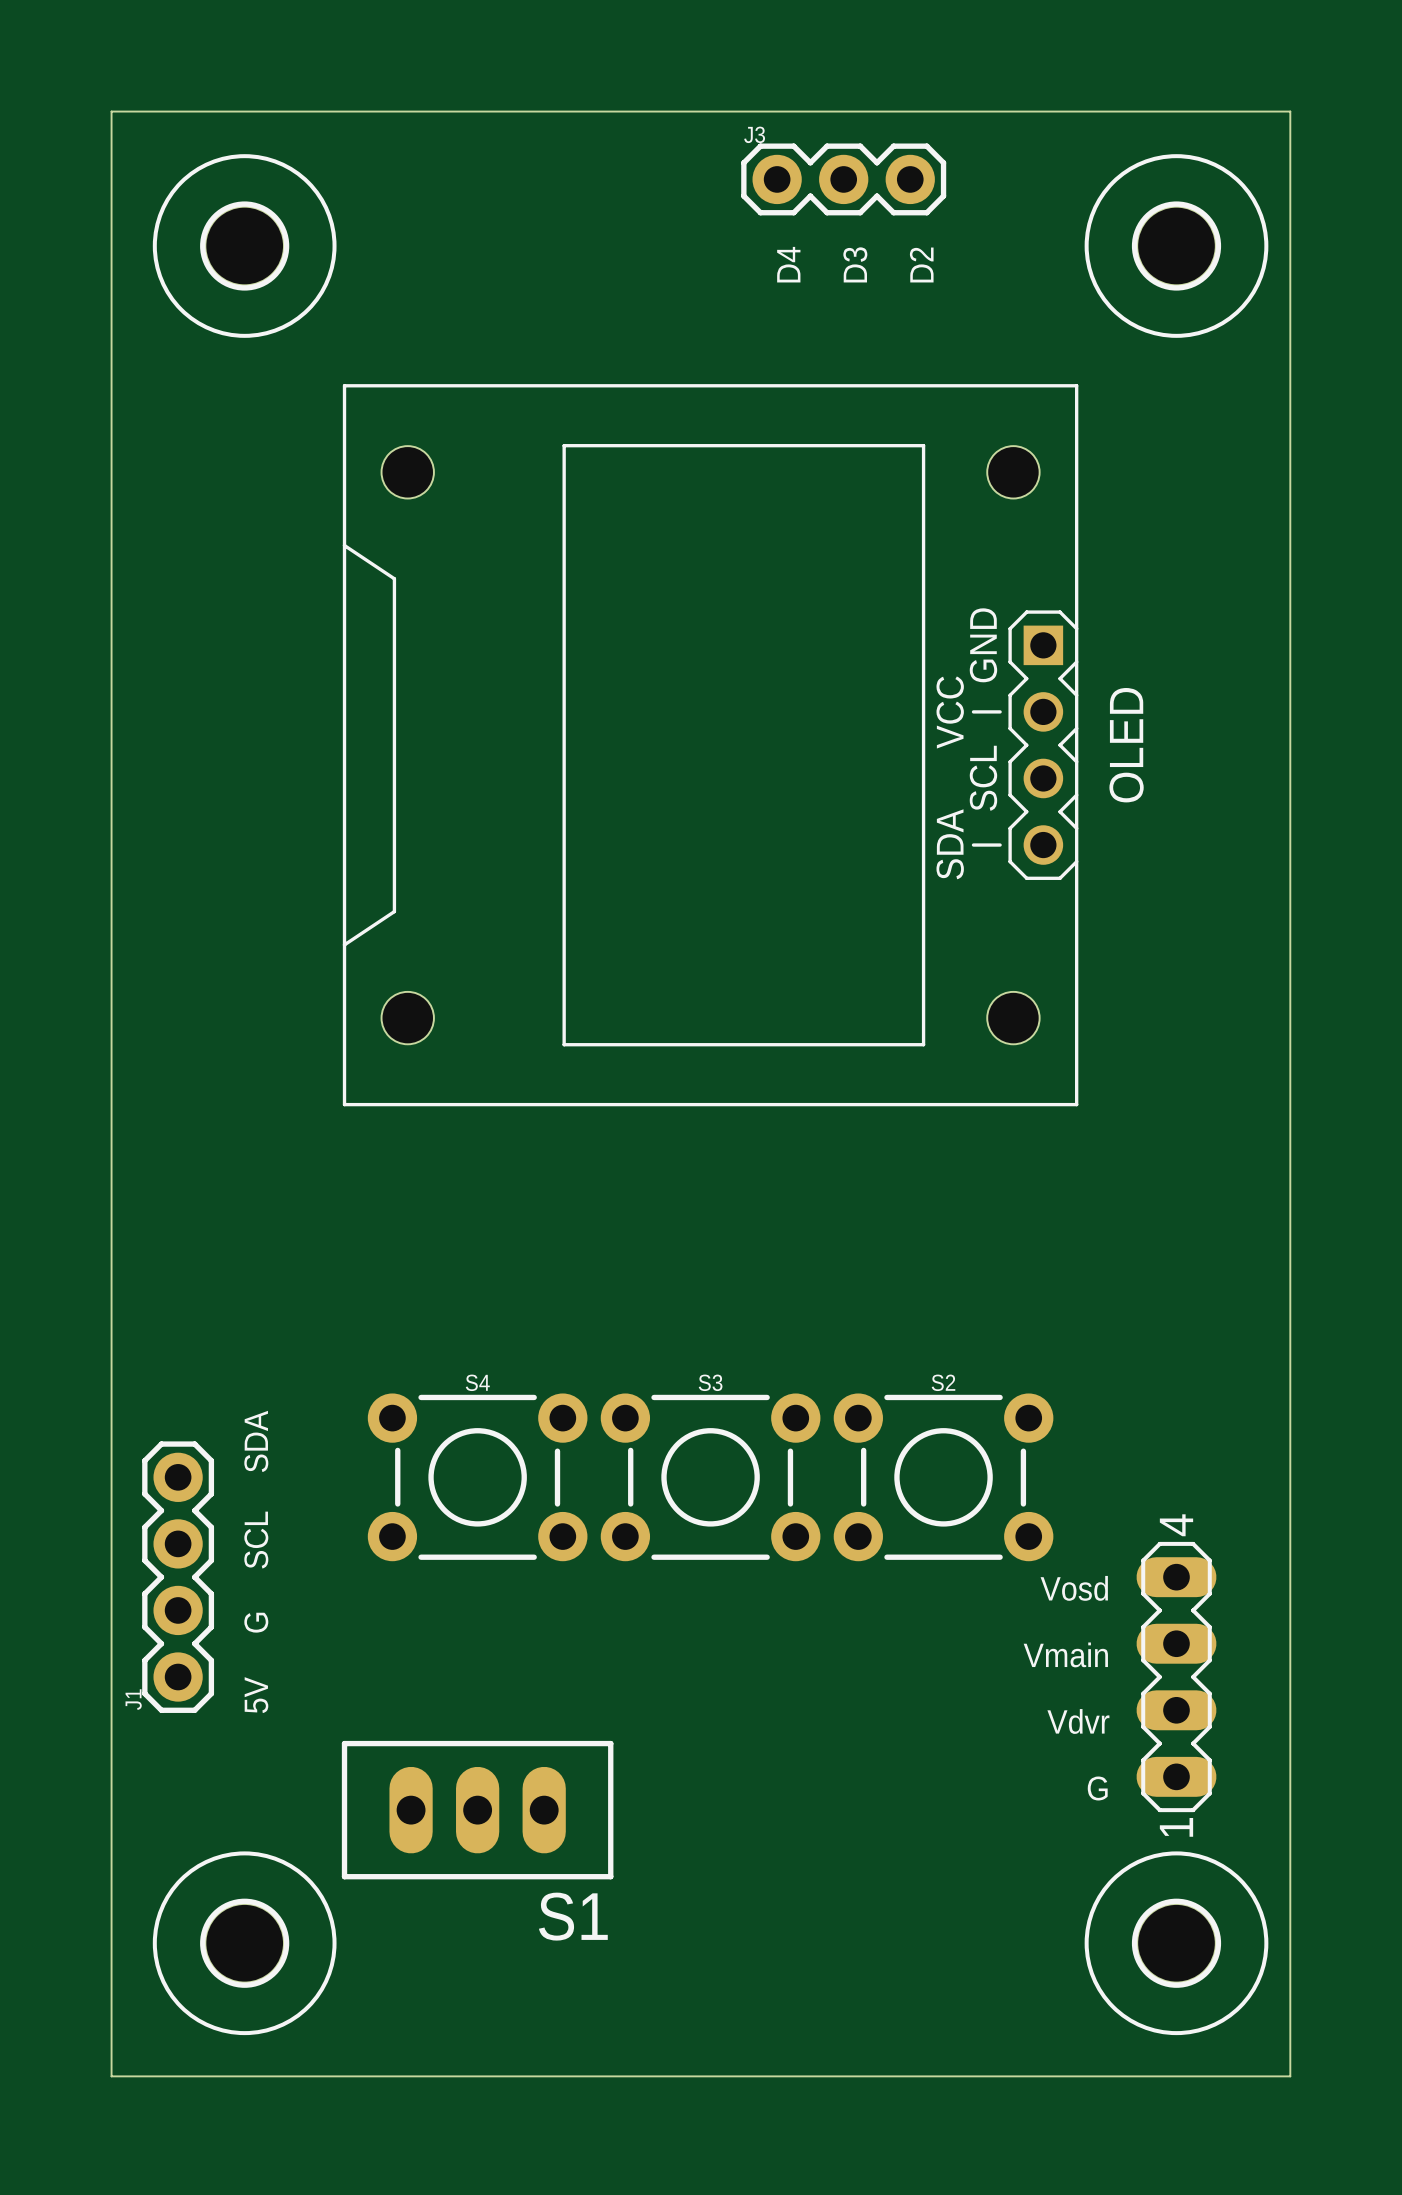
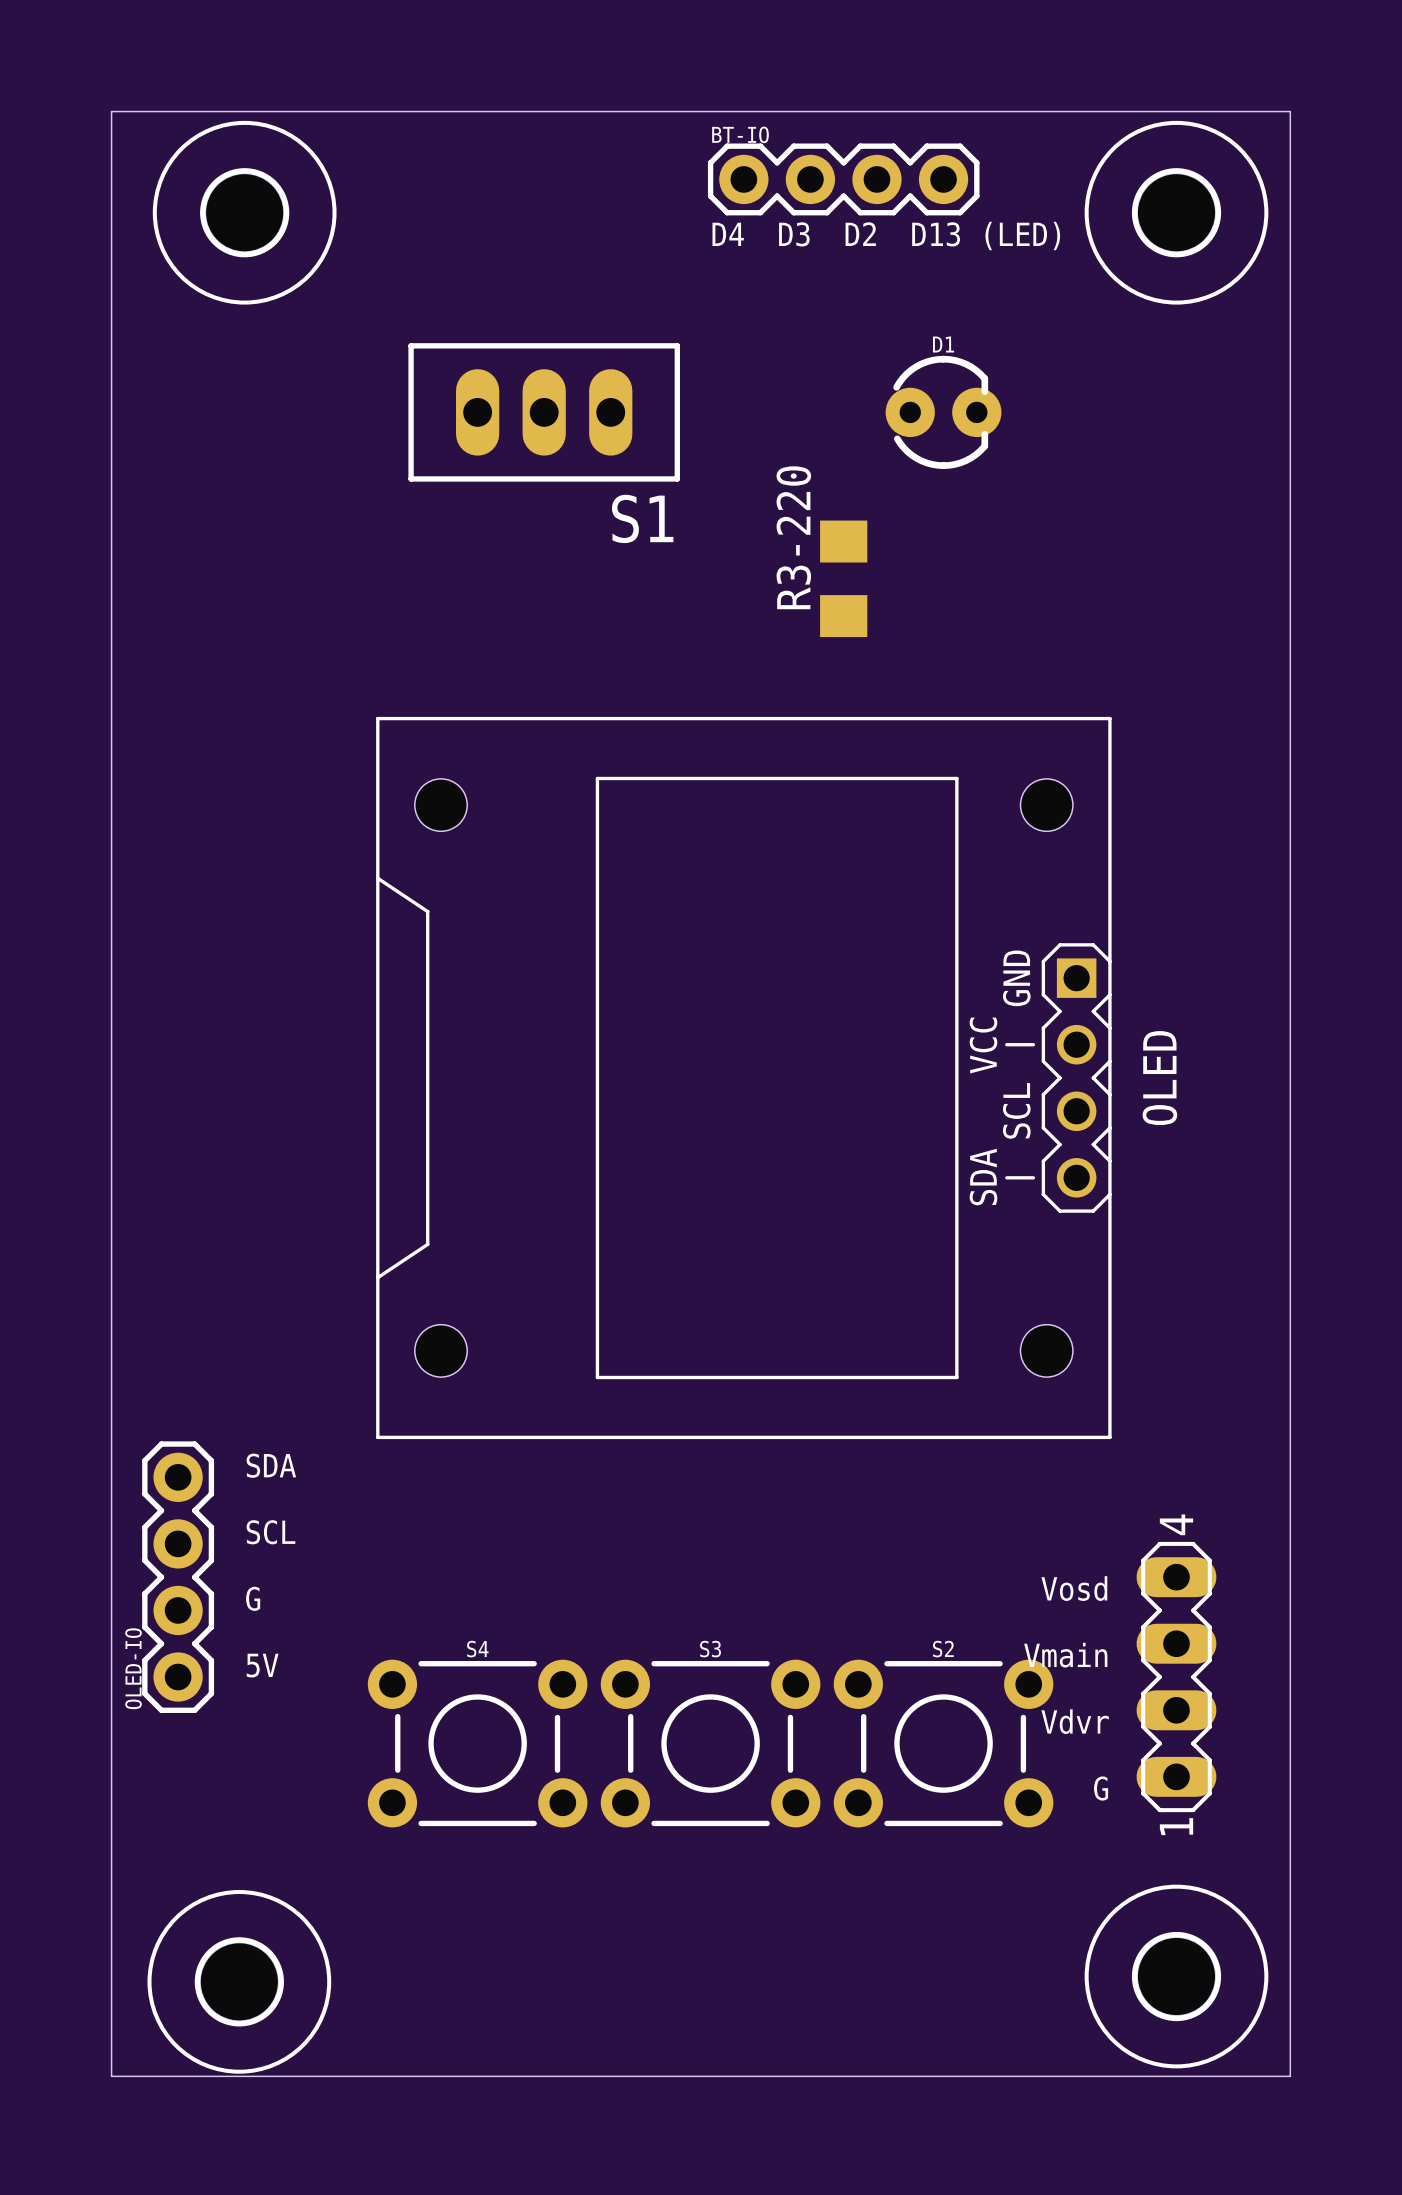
J3: (843, 179) -> none
BT-IO: none -> (843, 179)
text: none -> D13 (LED) (986, 235)
part position: (244, 246) -> (244, 212)
part position: (1176, 246) -> (1176, 212)
text rotation: 0° (788, 264) -> 90° clockwise (728, 234)
text position: D4 (788, 264) -> D4 (728, 234)
text rotation: 0° (855, 264) -> 90° clockwise (794, 234)
text position: D3 (855, 264) -> D3 (794, 234)
text rotation: 0° (921, 265) -> 90° clockwise (860, 234)
text position: D2 (921, 265) -> D2 (860, 234)
D1: none -> (943, 412)
R3-220: none -> (843, 578)
OLED position: (710, 745) -> (743, 1077)
text rotation: 0° (256, 1441) -> 90° clockwise (271, 1465)
S4 position: (477, 1477) -> (477, 1743)
S3 position: (710, 1477) -> (710, 1743)
S2 position: (943, 1477) -> (943, 1743)
text rotation: 0° (256, 1540) -> 90° clockwise (270, 1532)
text rotation: 0° (256, 1622) -> 90° clockwise (253, 1598)
text rotation: 0° (256, 1695) -> 90° clockwise (262, 1665)
J1 name: J1 (133, 1699) -> OLED-IO (133, 1668)
S1 position: (477, 1810) -> (544, 412)
part position: (244, 1943) -> (239, 1981)
part position: (1176, 1943) -> (1176, 1976)

